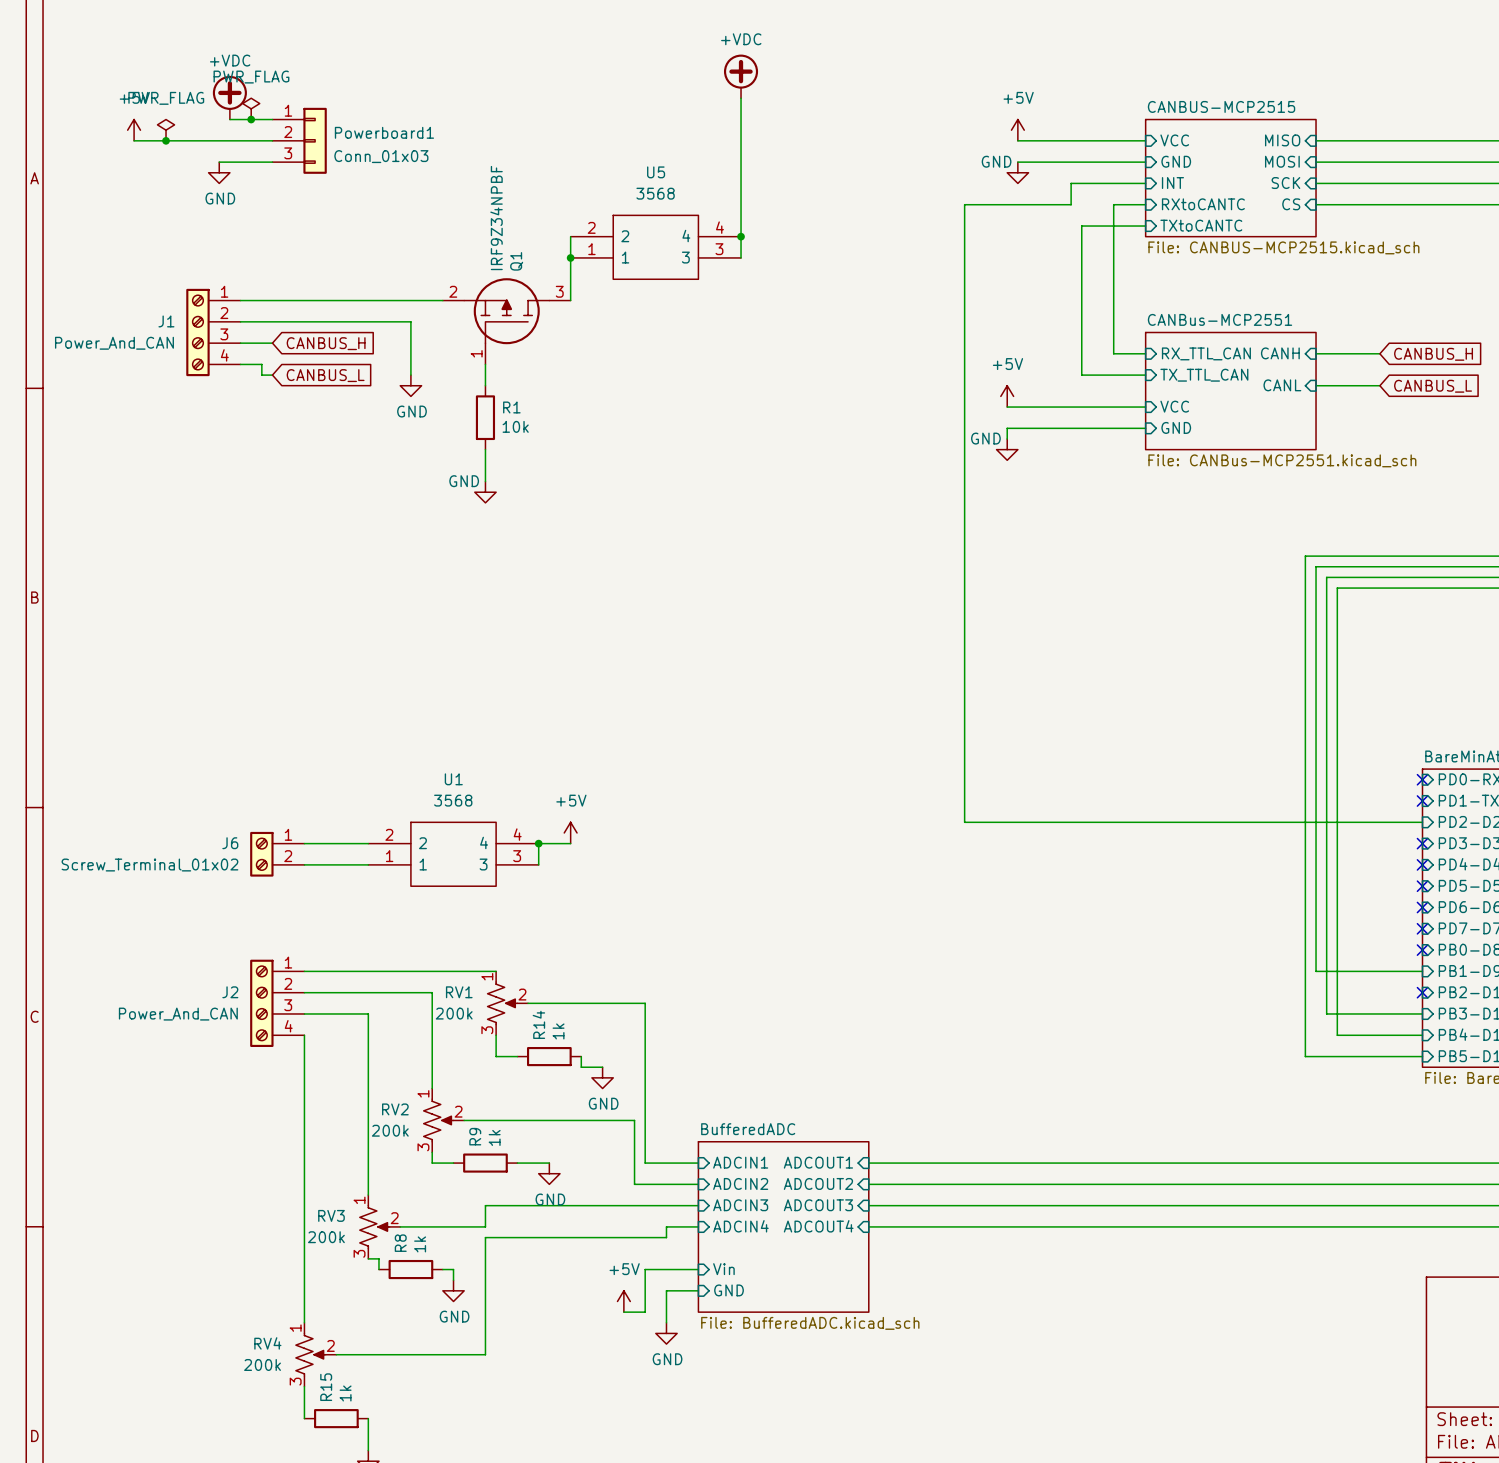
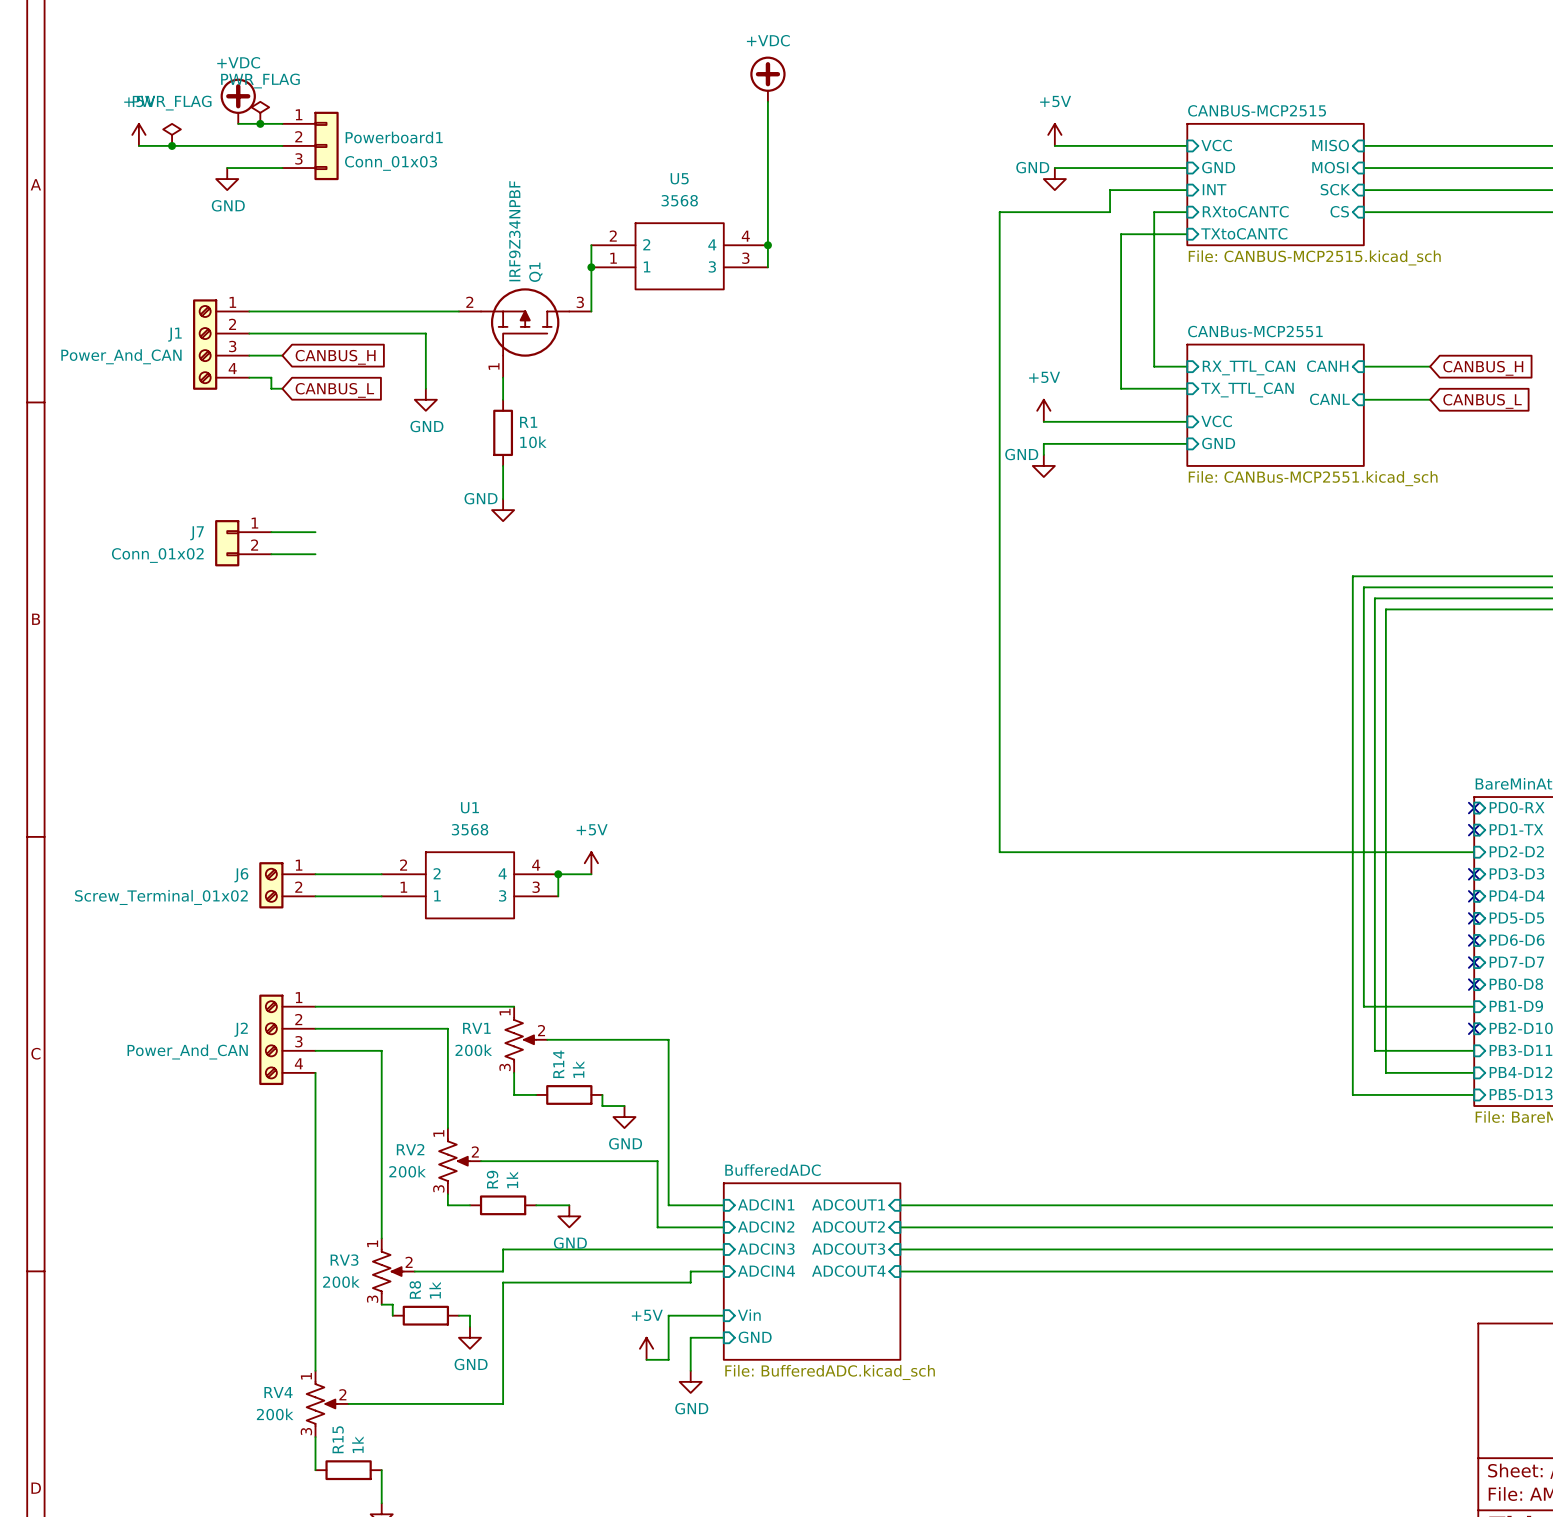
wire: none -> (271, 532) (315, 532)
J7: none -> Conn_01x02 (243, 543)
wire: none -> (271, 554) (315, 554)

